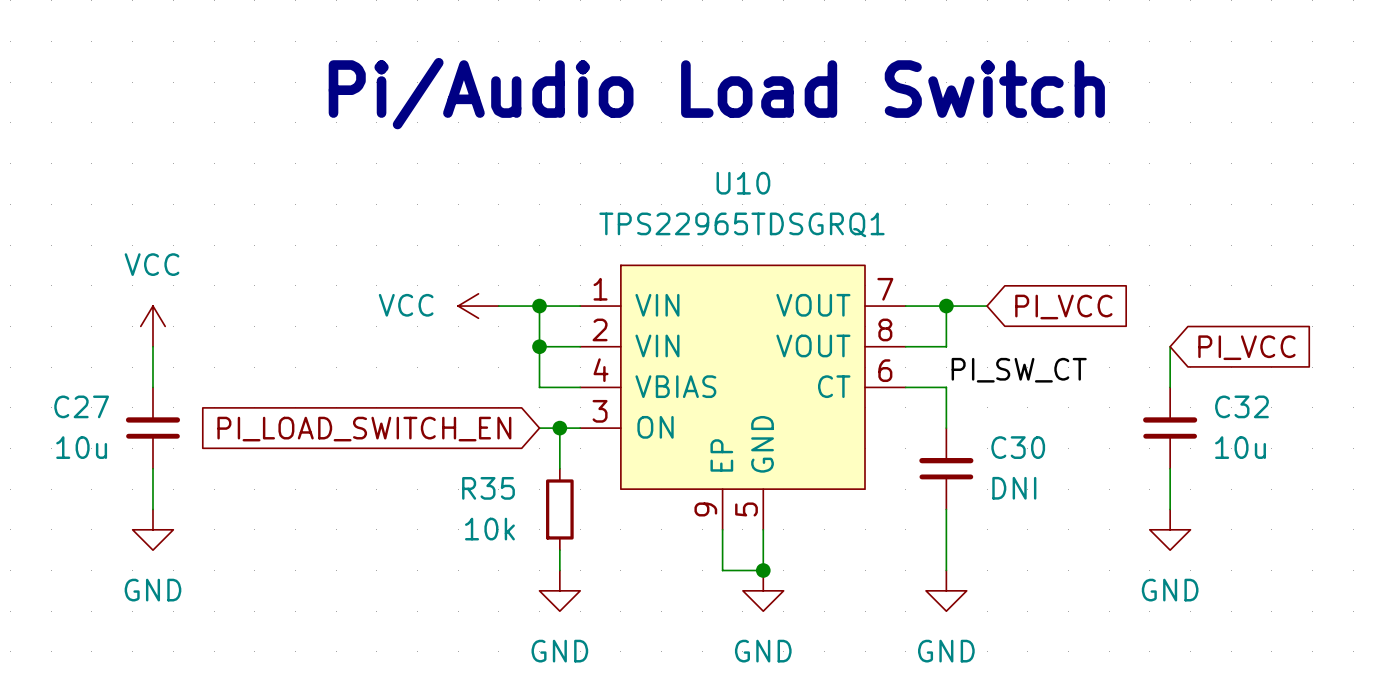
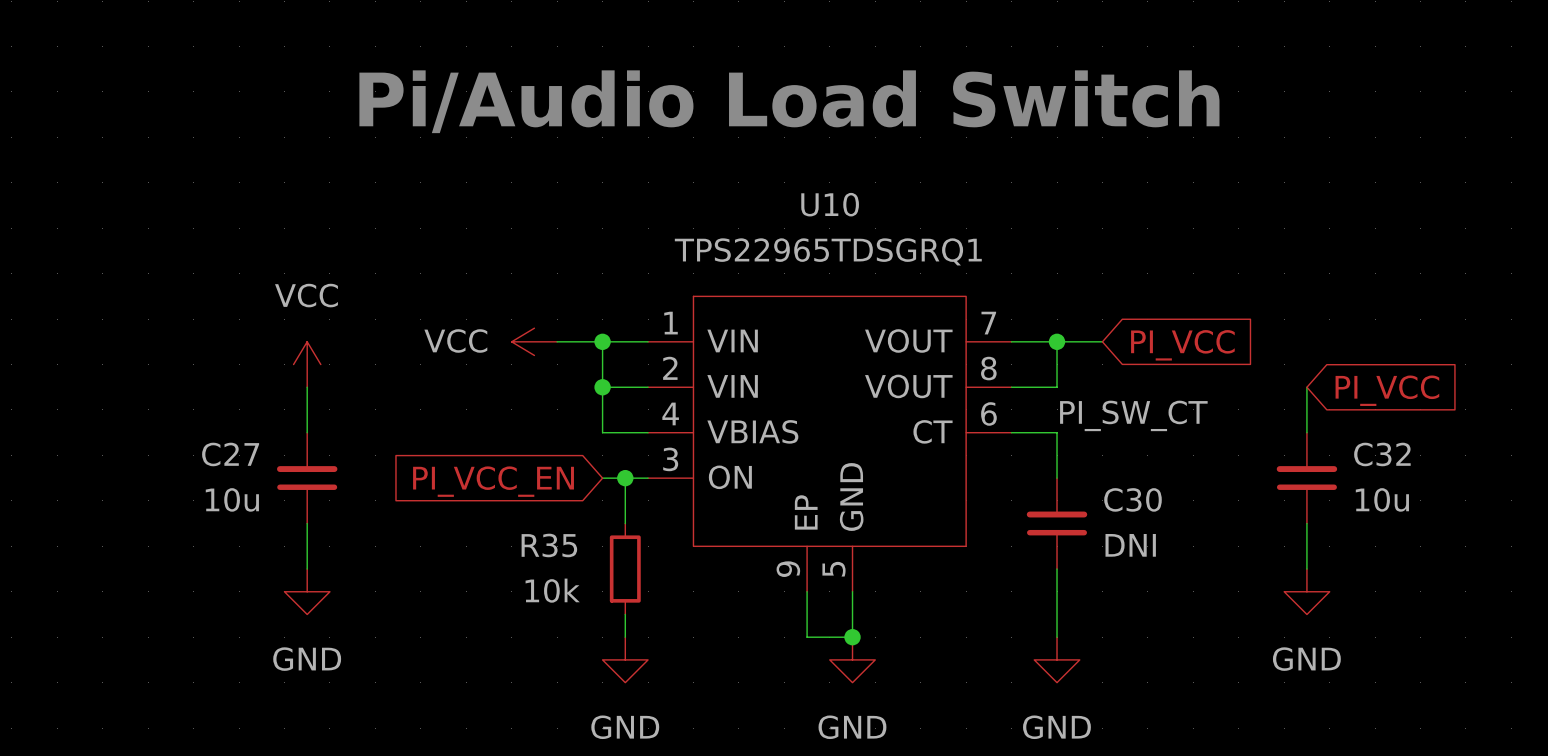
power symbol position: VCC (152, 326) -> VCC (307, 364)
wire: (152, 346) (152, 387) -> (307, 387) (307, 432)
C27 position: (152, 428) -> (307, 478)
global label: PI_LOAD_SWITCH_EN (364, 429) -> PI_VCC_EN (493, 481)
wire: (152, 468) (152, 509) -> (307, 523) (307, 569)
power symbol position: GND (152, 529) -> GND (307, 591)

